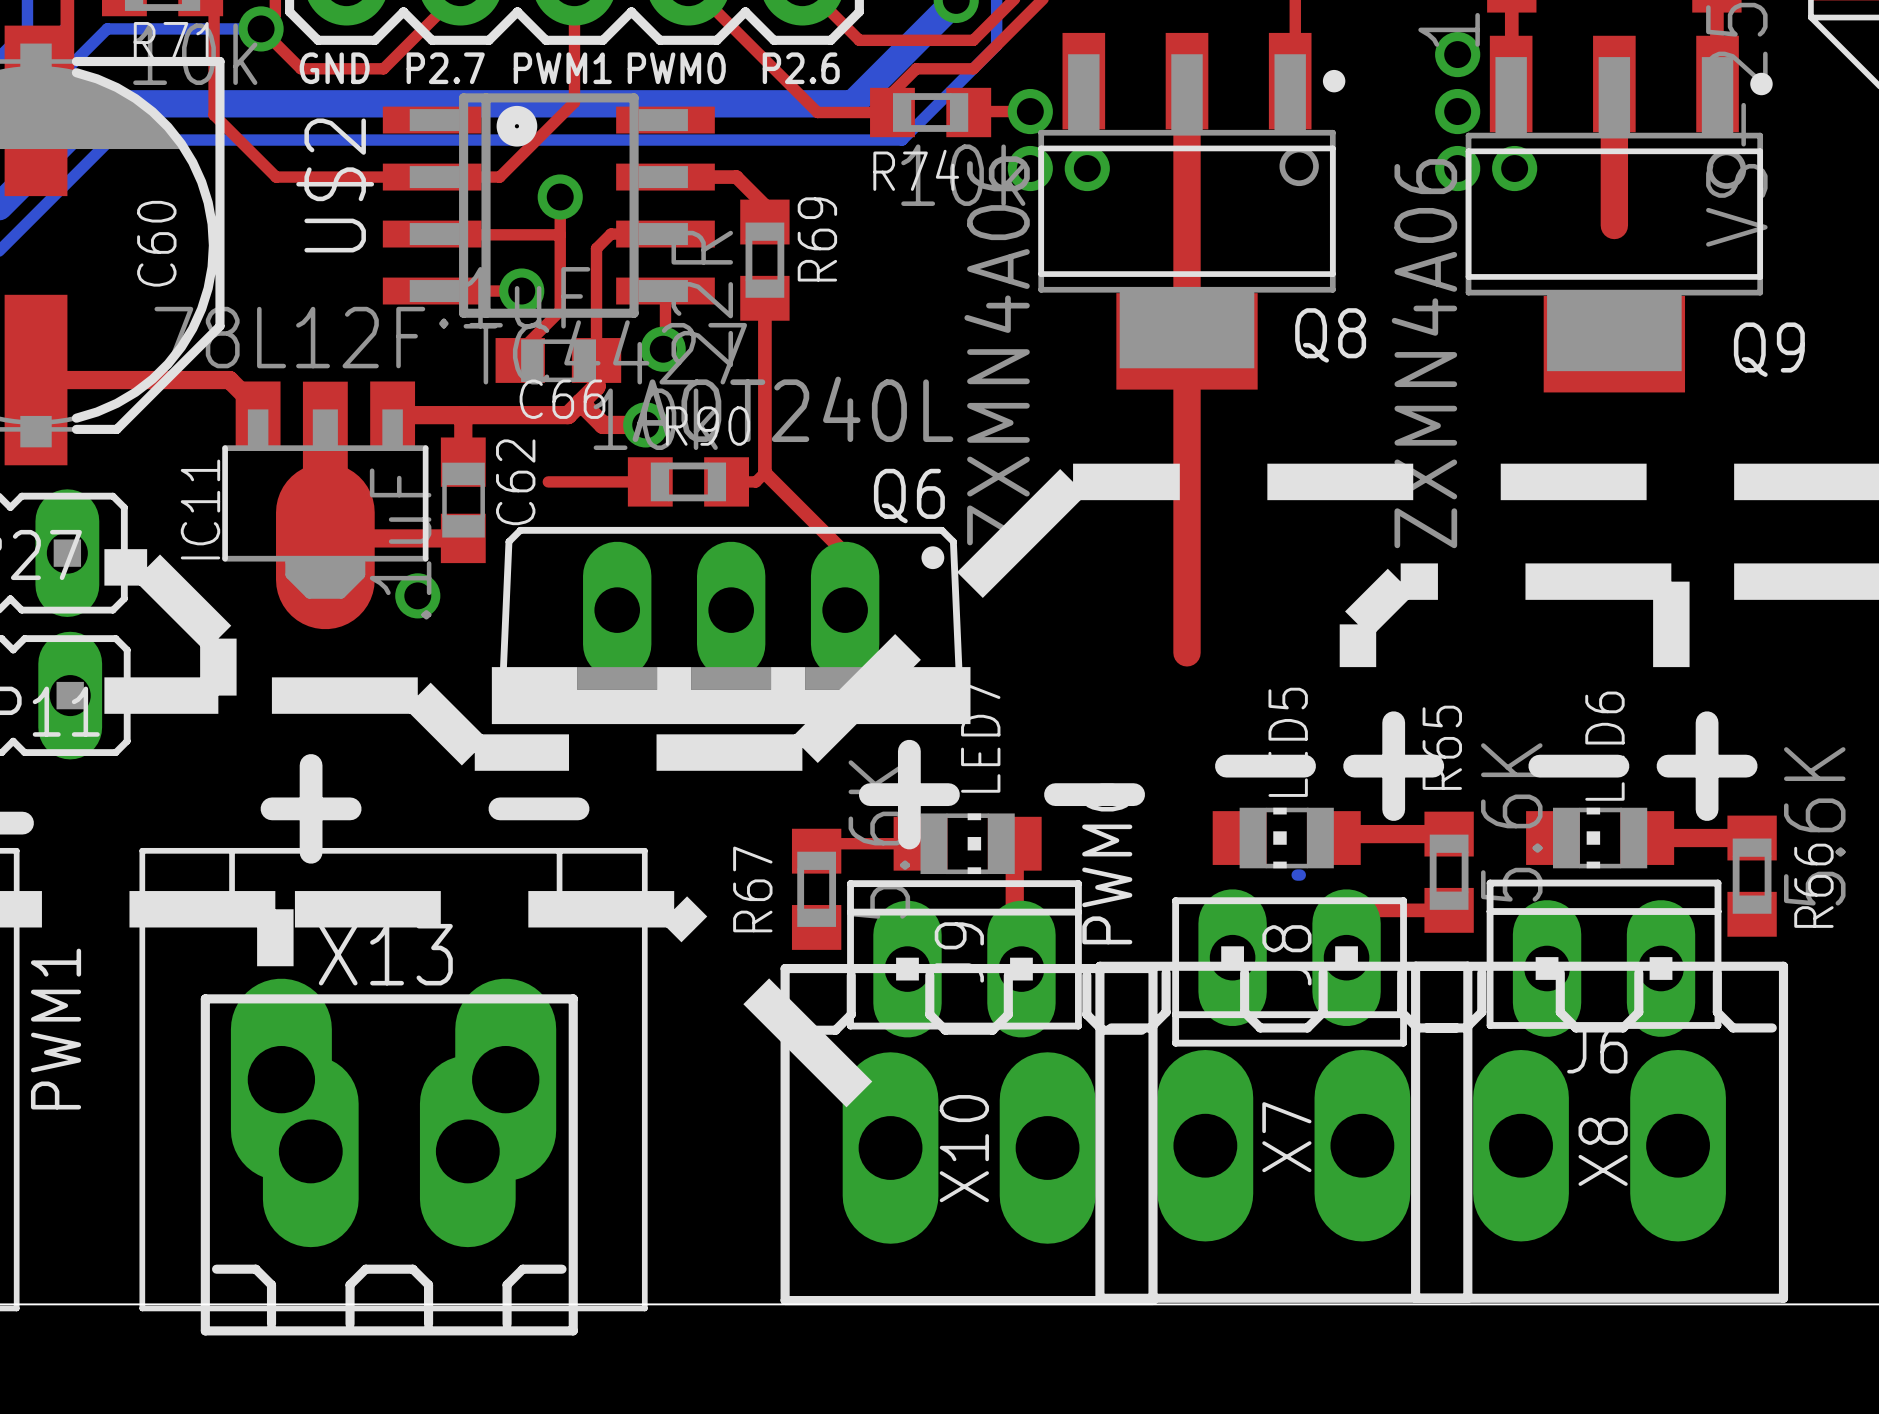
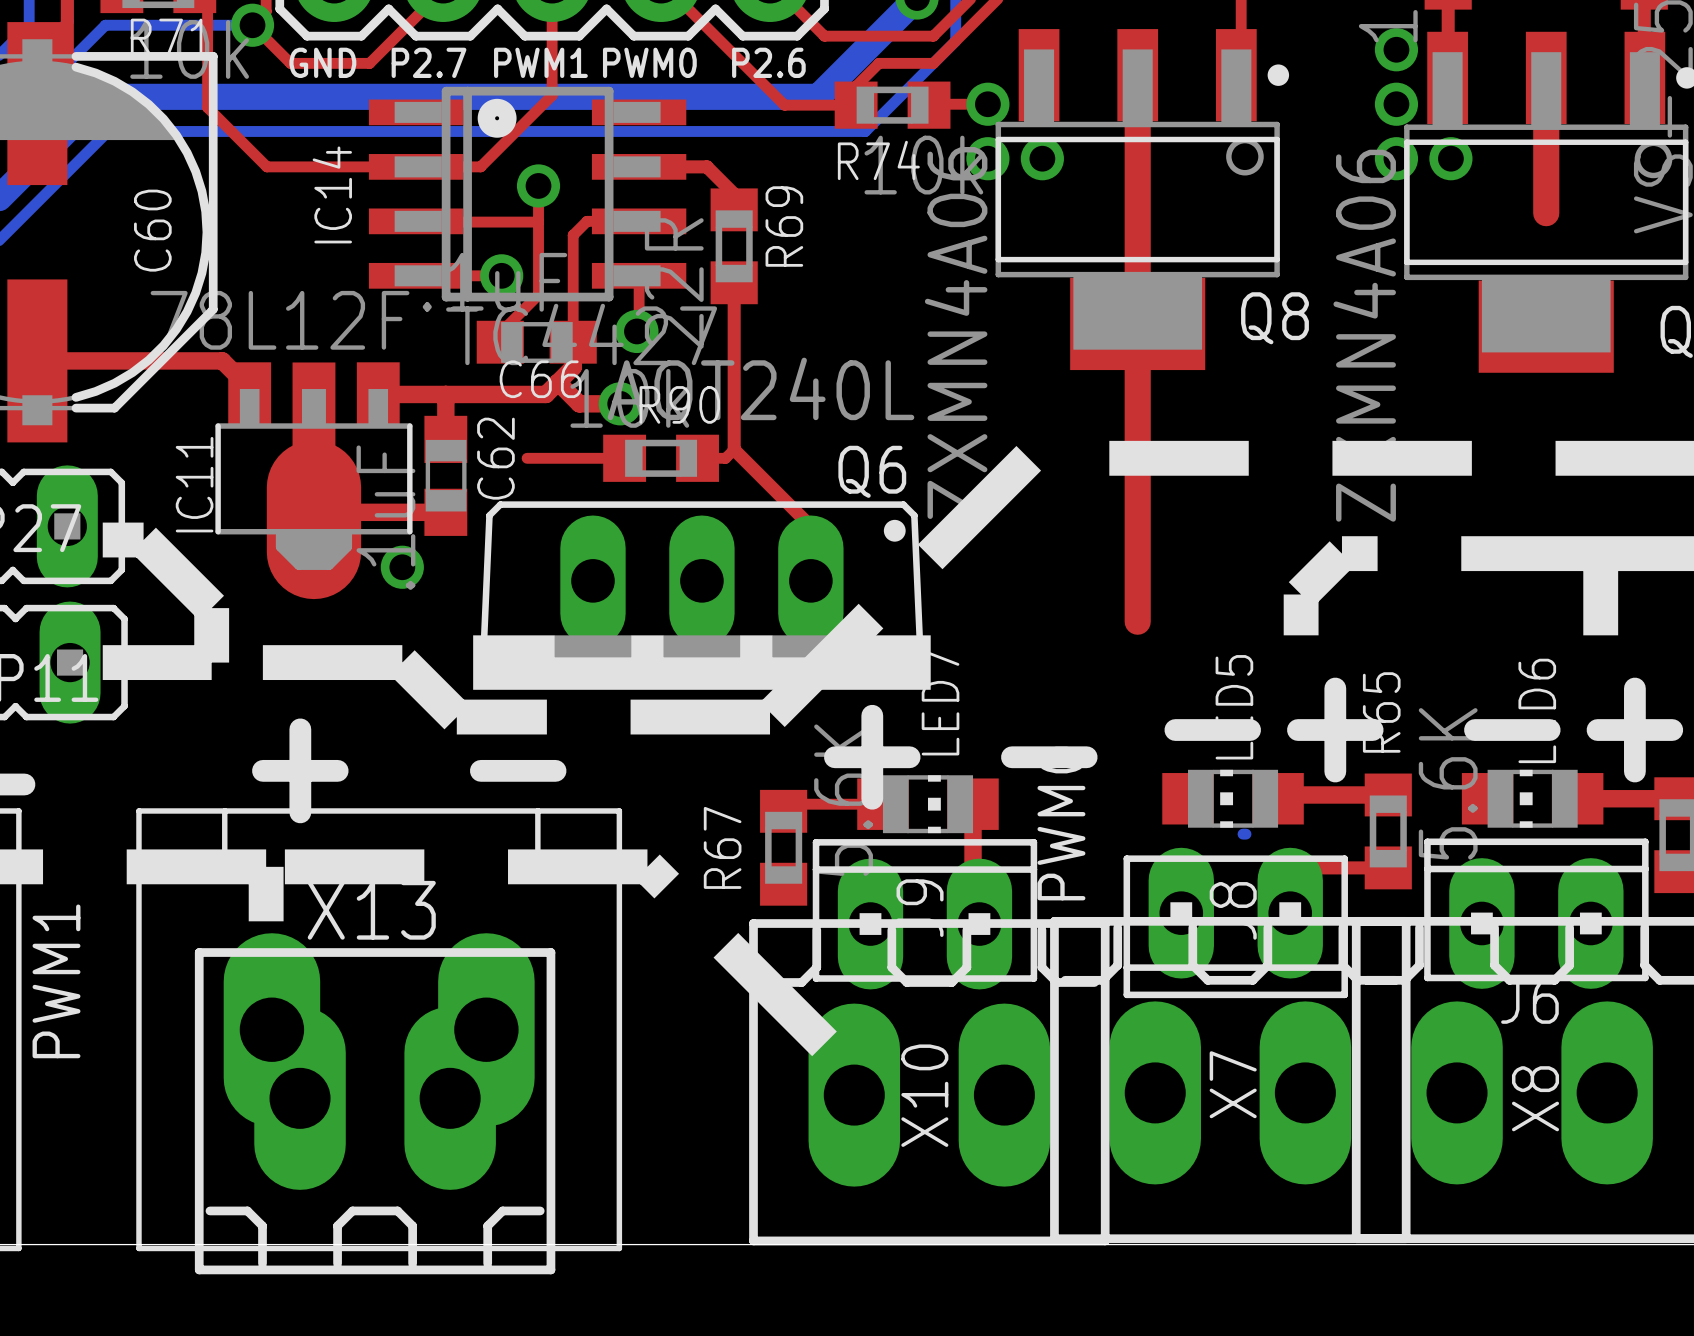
U$2 name: U$2 (335, 185) -> IC14 (332, 194)

